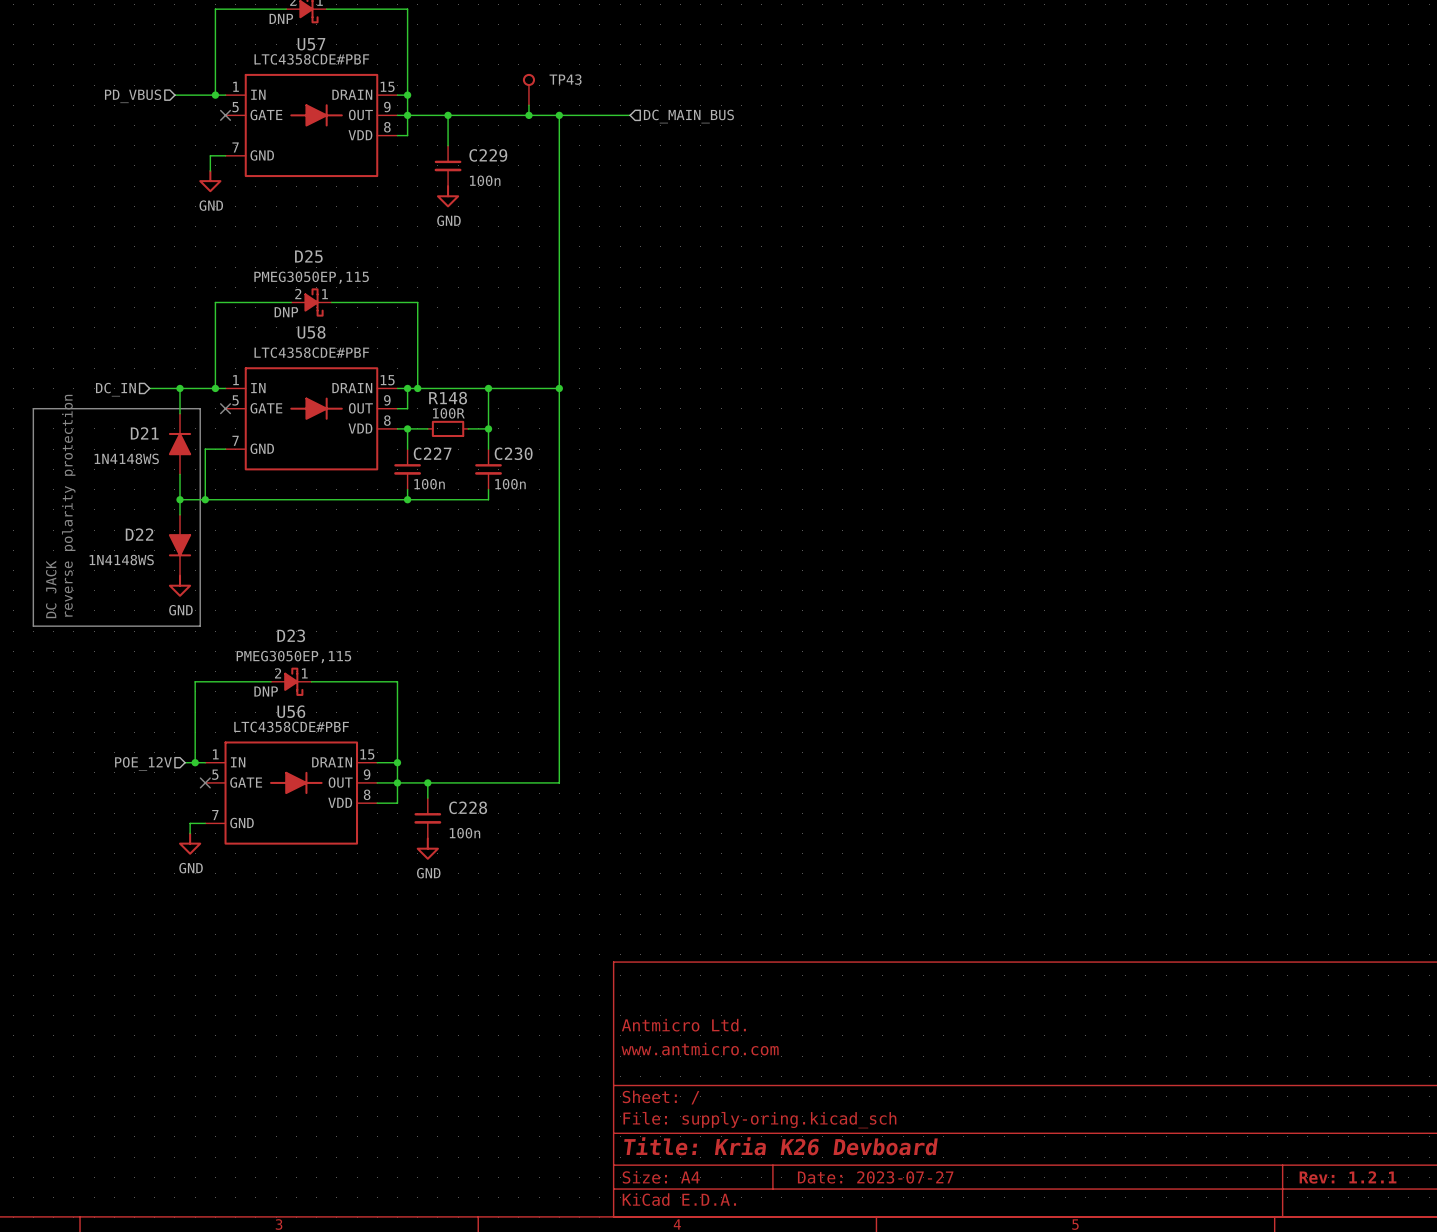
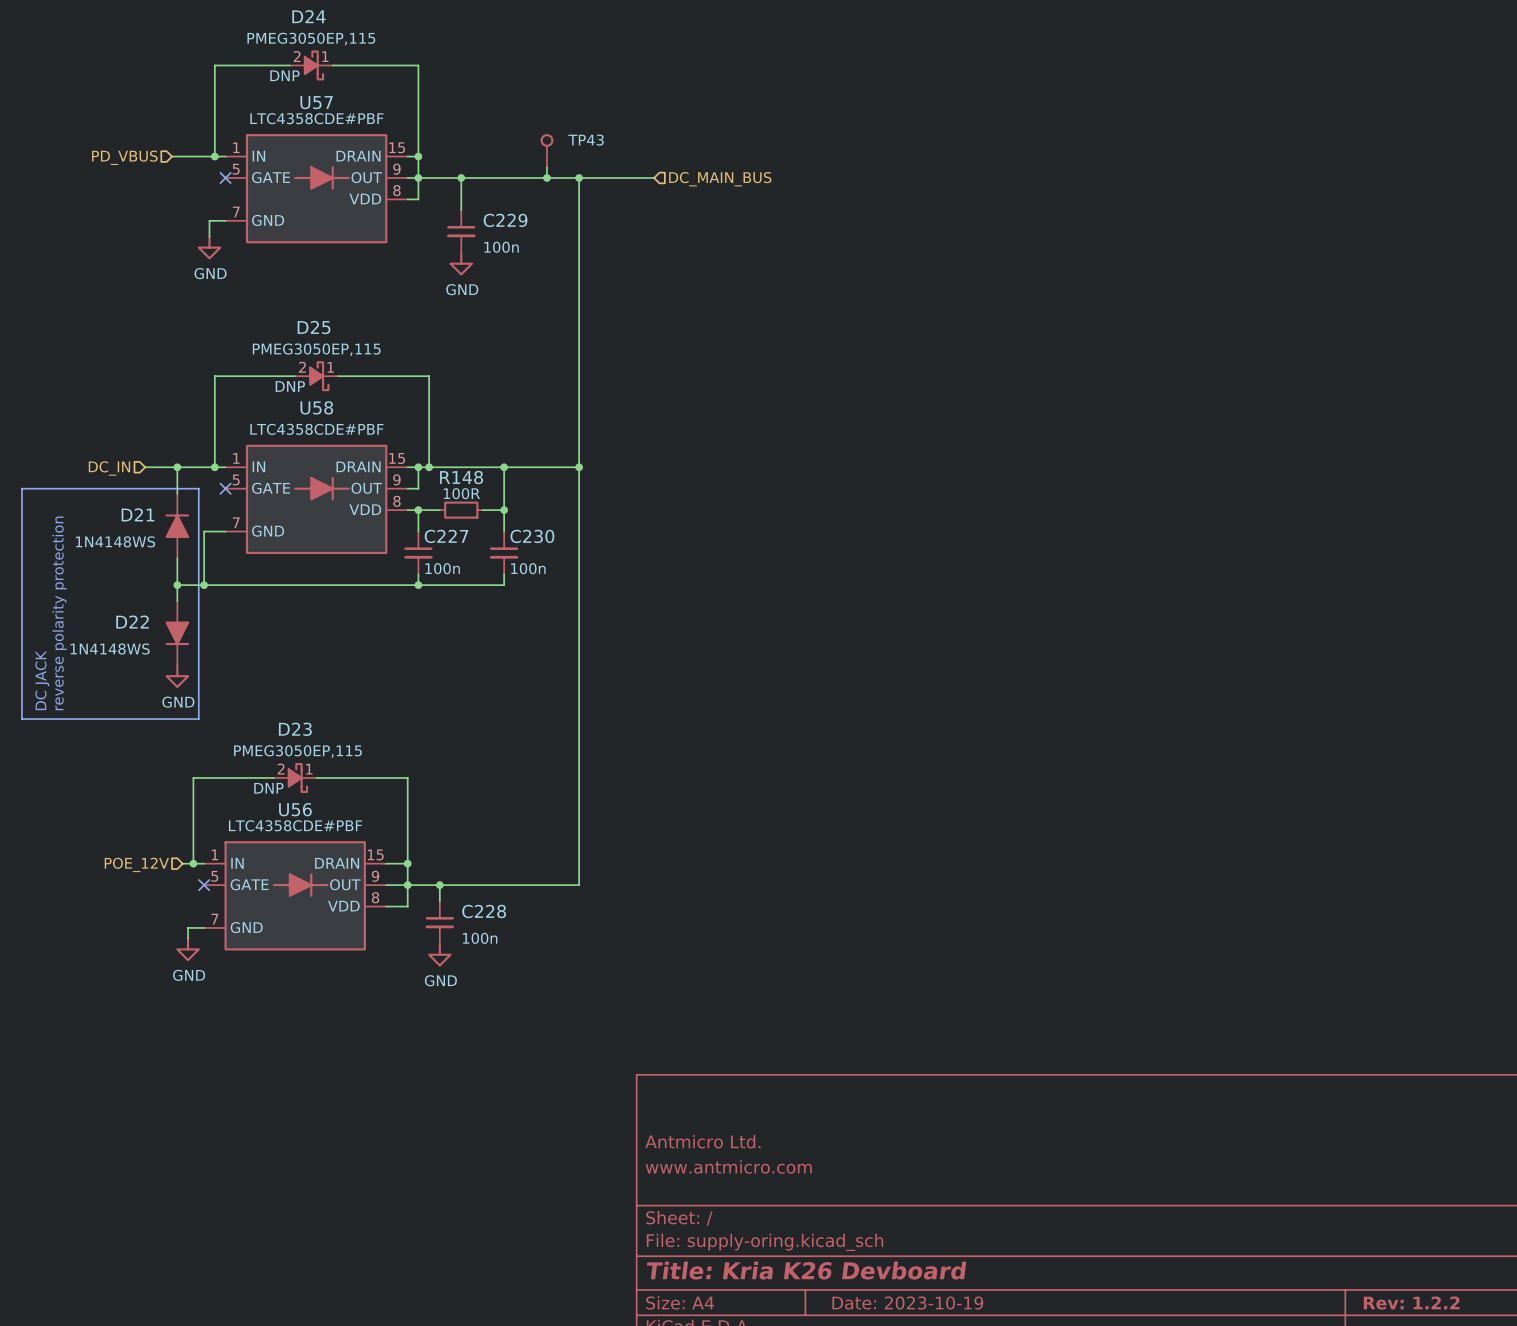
title block: Date: 2023-07-27 (875, 1177) -> Date: 2023-10-19 (907, 1303)
title block: Rev: 1.2.1 (1348, 1177) -> Rev: 1.2.2 (1411, 1303)

